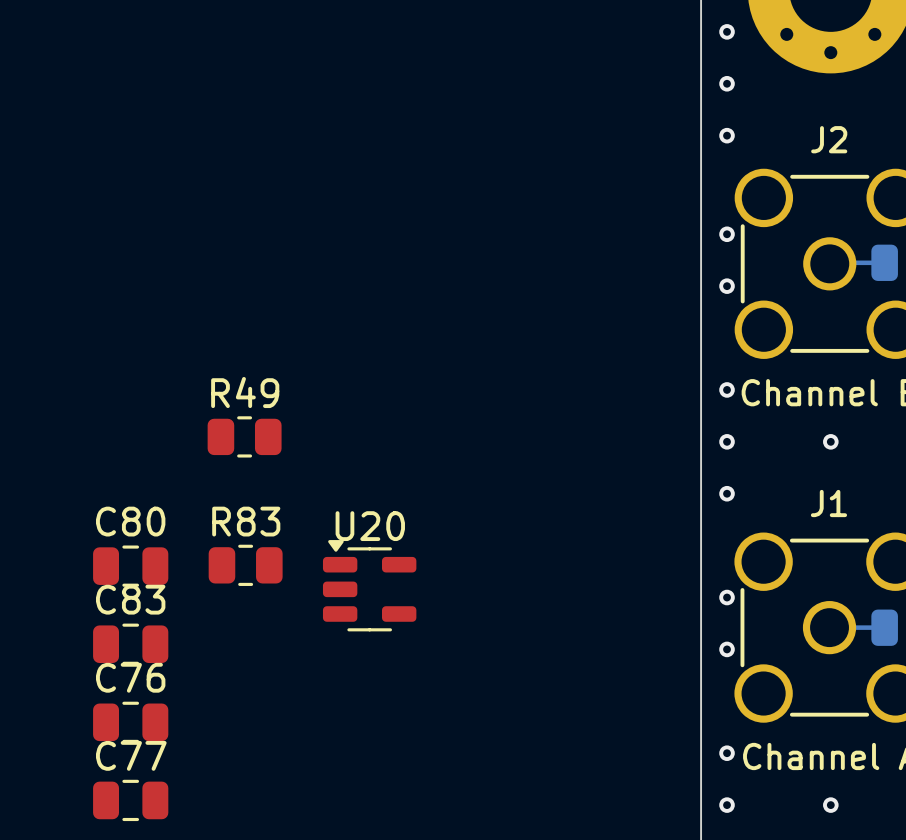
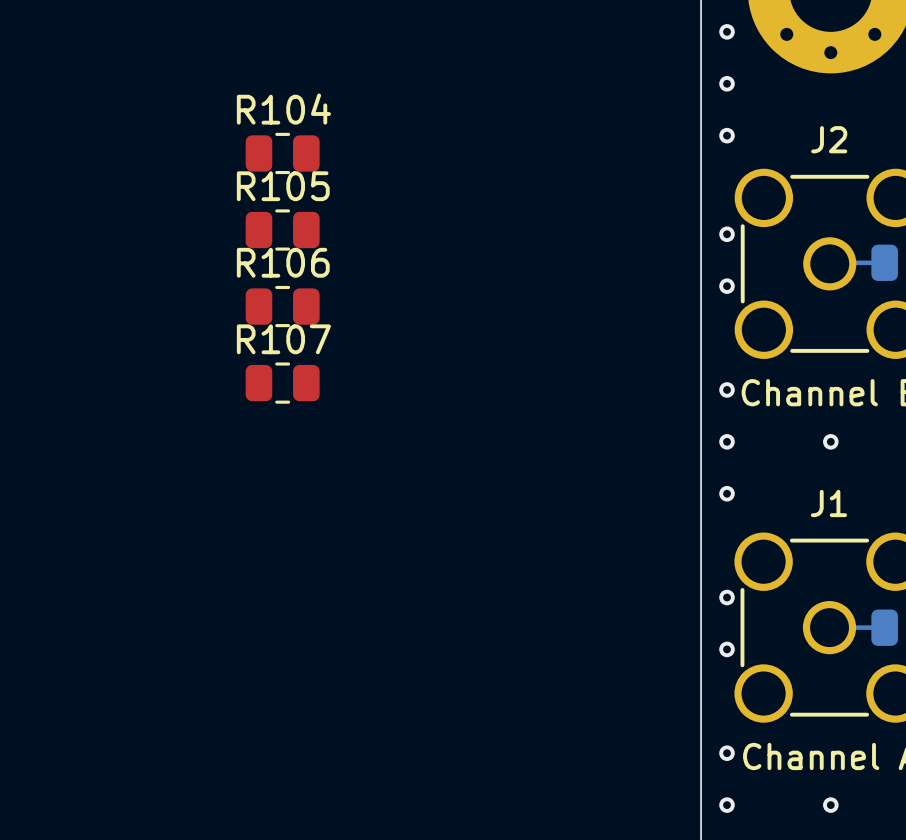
R104: none -> (282, 153)
R105: none -> (282, 230)
R106: none -> (282, 306)
R107: none -> (282, 383)
R49: (244, 436) -> none
R83: (245, 565) -> none
C80: (130, 566) -> none
U20: (369, 585) -> none
C83: (130, 644) -> none
C76: (130, 722) -> none
C77: (130, 800) -> none

